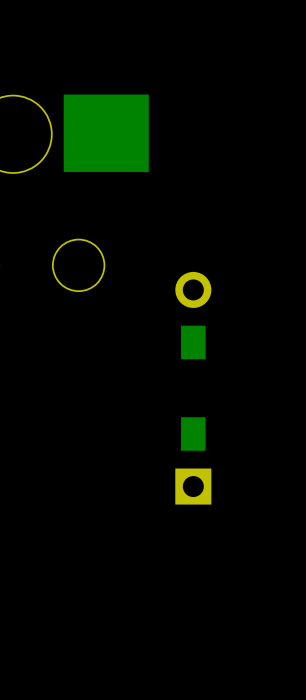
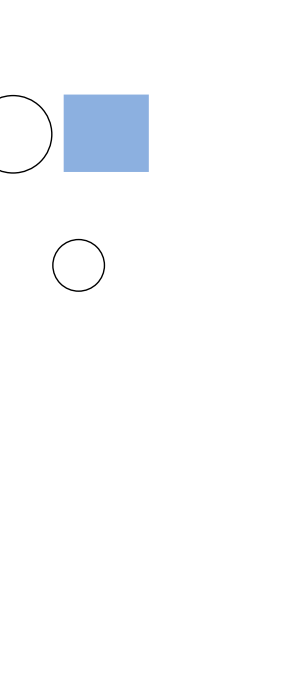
part: (193, 388) -> none

